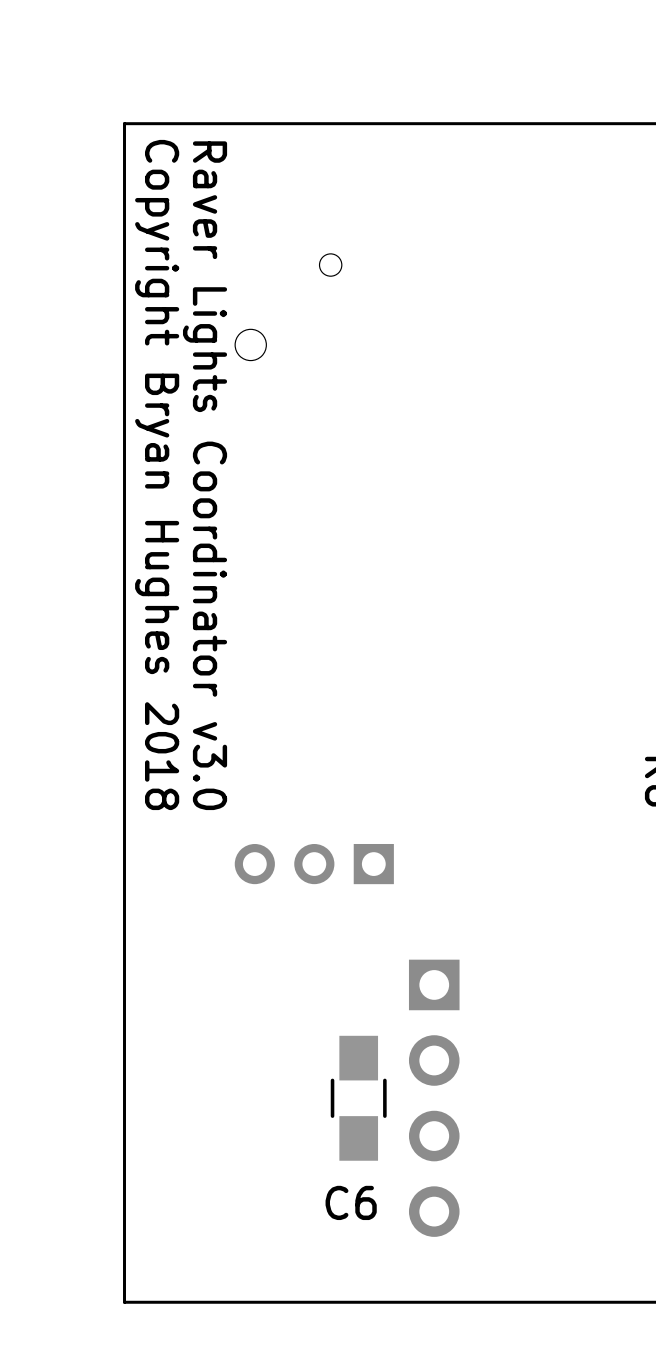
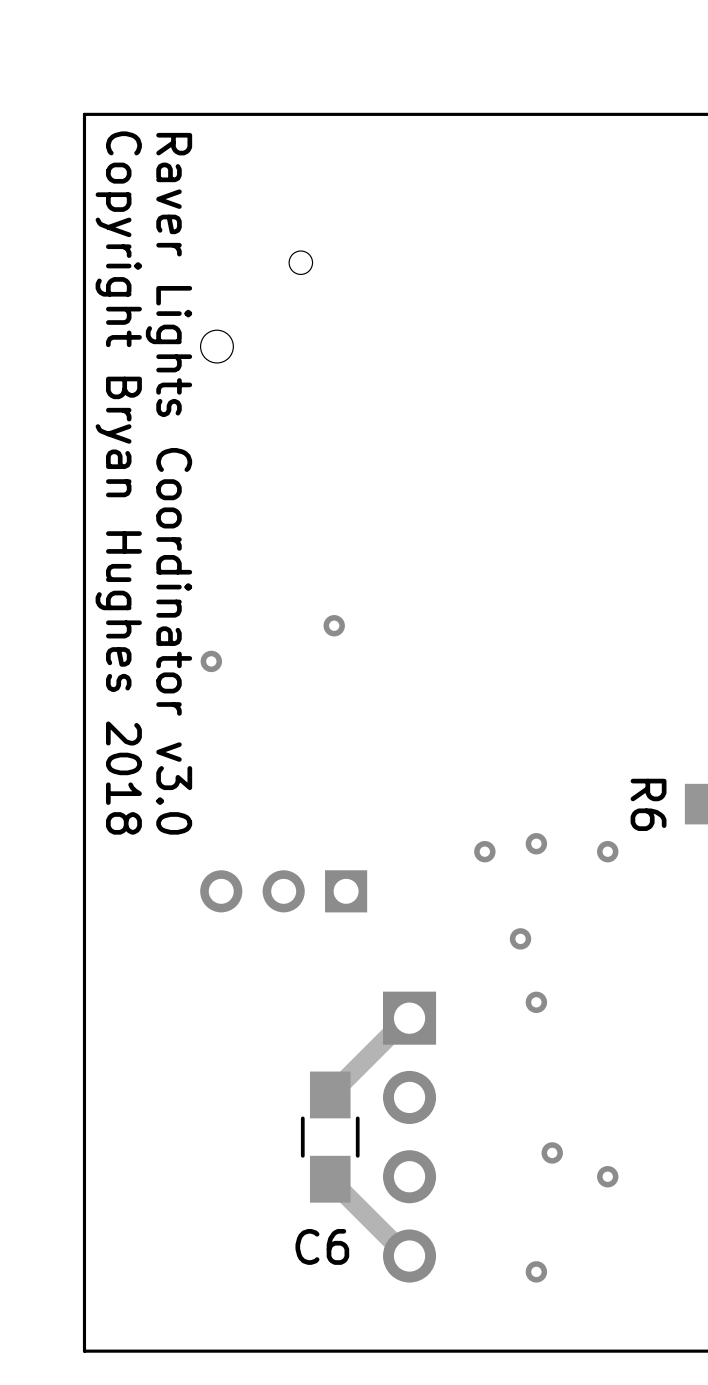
via: none -> (334, 625)
via: none -> (211, 661)
via: none -> (536, 843)
via: none -> (484, 851)
via: none -> (607, 851)
via: none -> (520, 938)
via: none -> (536, 1002)
track: none -> (409, 1018) (407, 1018) (330, 1094)
via: none -> (552, 1152)
via: none -> (607, 1176)
track: none -> (330, 1179) (407, 1256) (409, 1256)
via: none -> (536, 1271)

